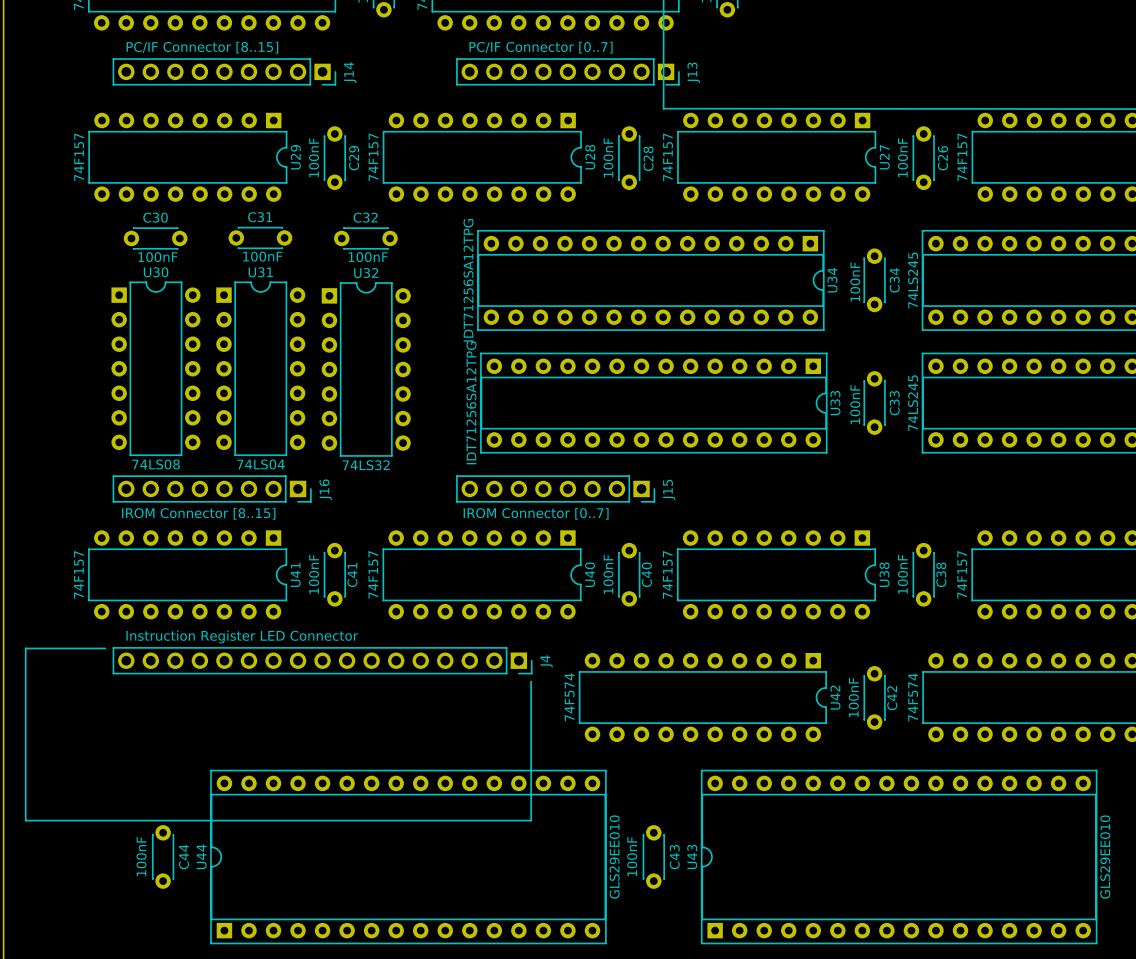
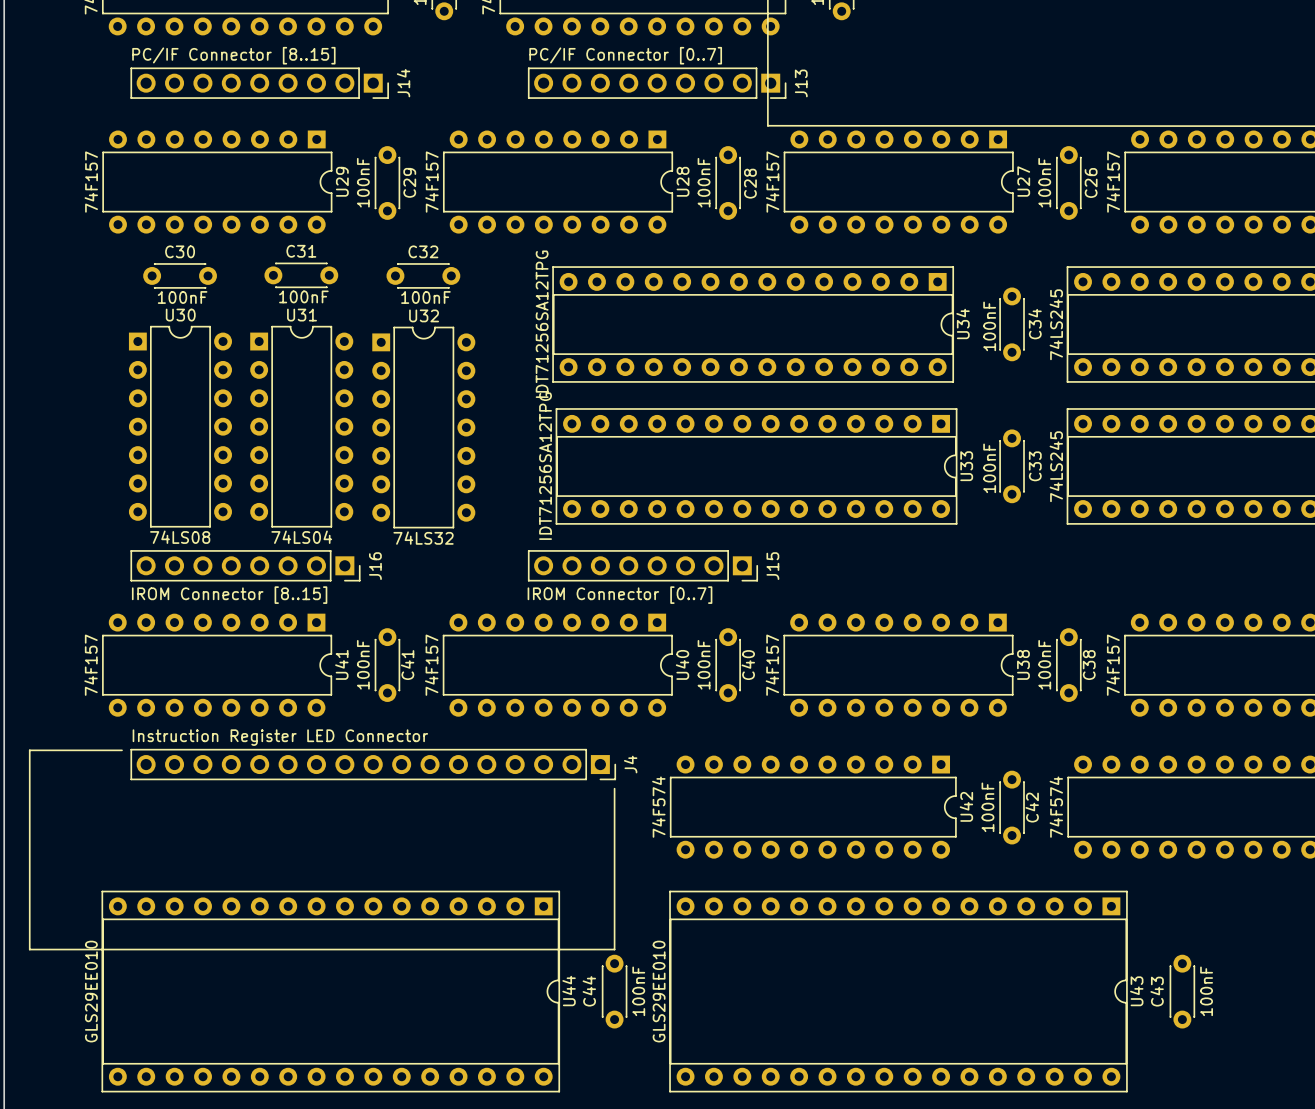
C44 value position: 100nF (141, 856) -> 100nF (638, 991)
C44 position: (163, 856) -> (614, 991)
C44 name position: C44 (183, 856) -> C44 (589, 991)
C43 value position: 100nF (632, 856) -> 100nF (1206, 991)
C43 position: (653, 856) -> (1182, 991)
U44 rotation: 0° (408, 857) -> 180° (330, 991)
C43 name position: C43 (674, 857) -> C43 (1157, 991)
U43 rotation: 0° (899, 857) -> 180° (898, 991)

